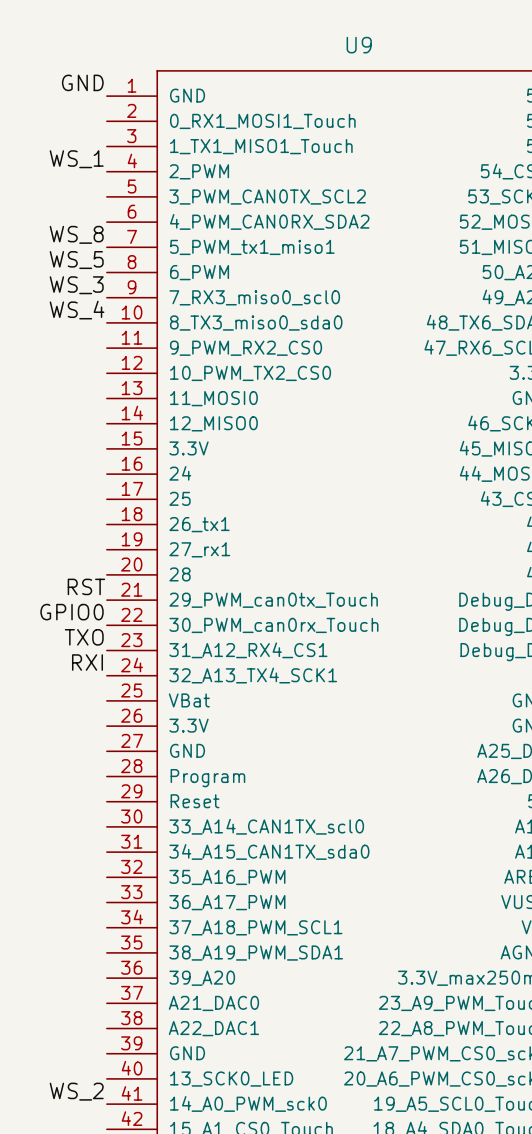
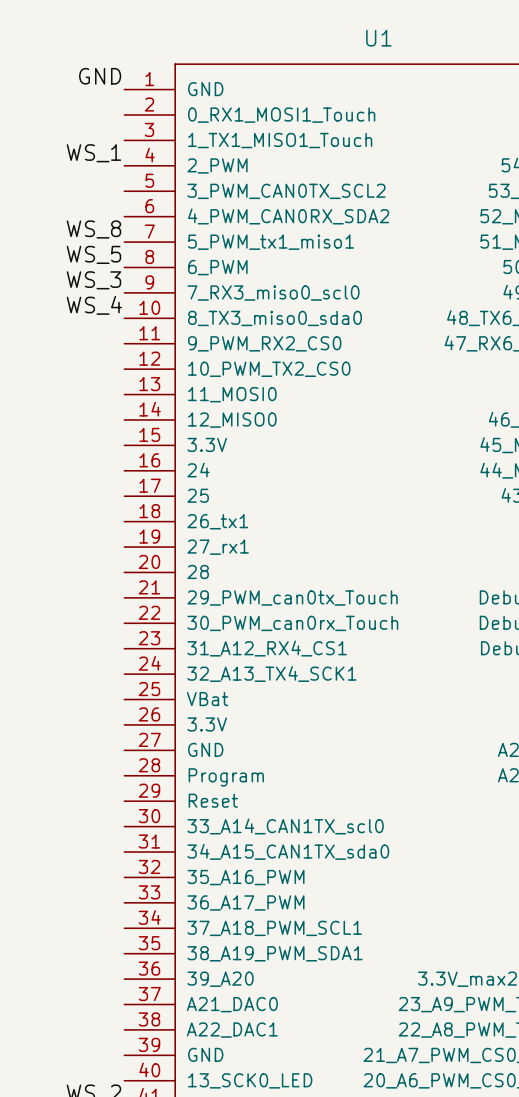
U9 name: U9 (359, 45) -> U1 (378, 38)
label: RST (86, 586) -> none
label: GPIO0 (72, 612) -> none
label: TXO (84, 637) -> none
label: RXI (87, 662) -> none

